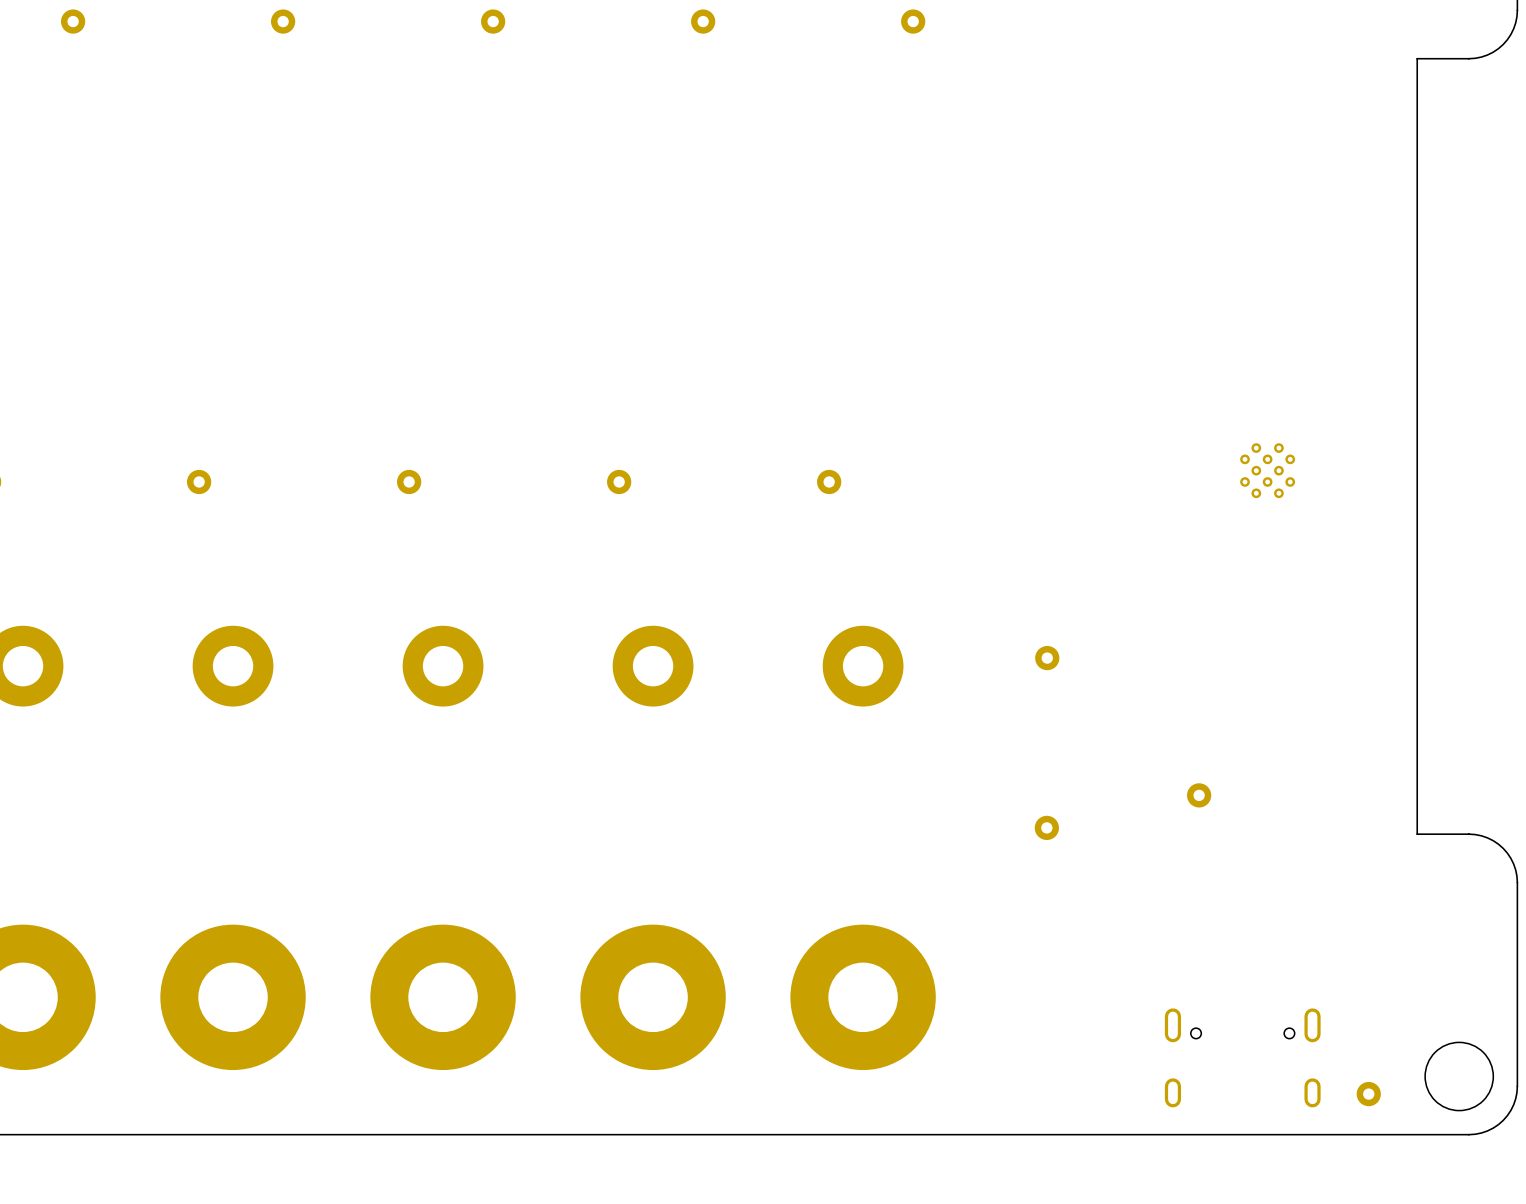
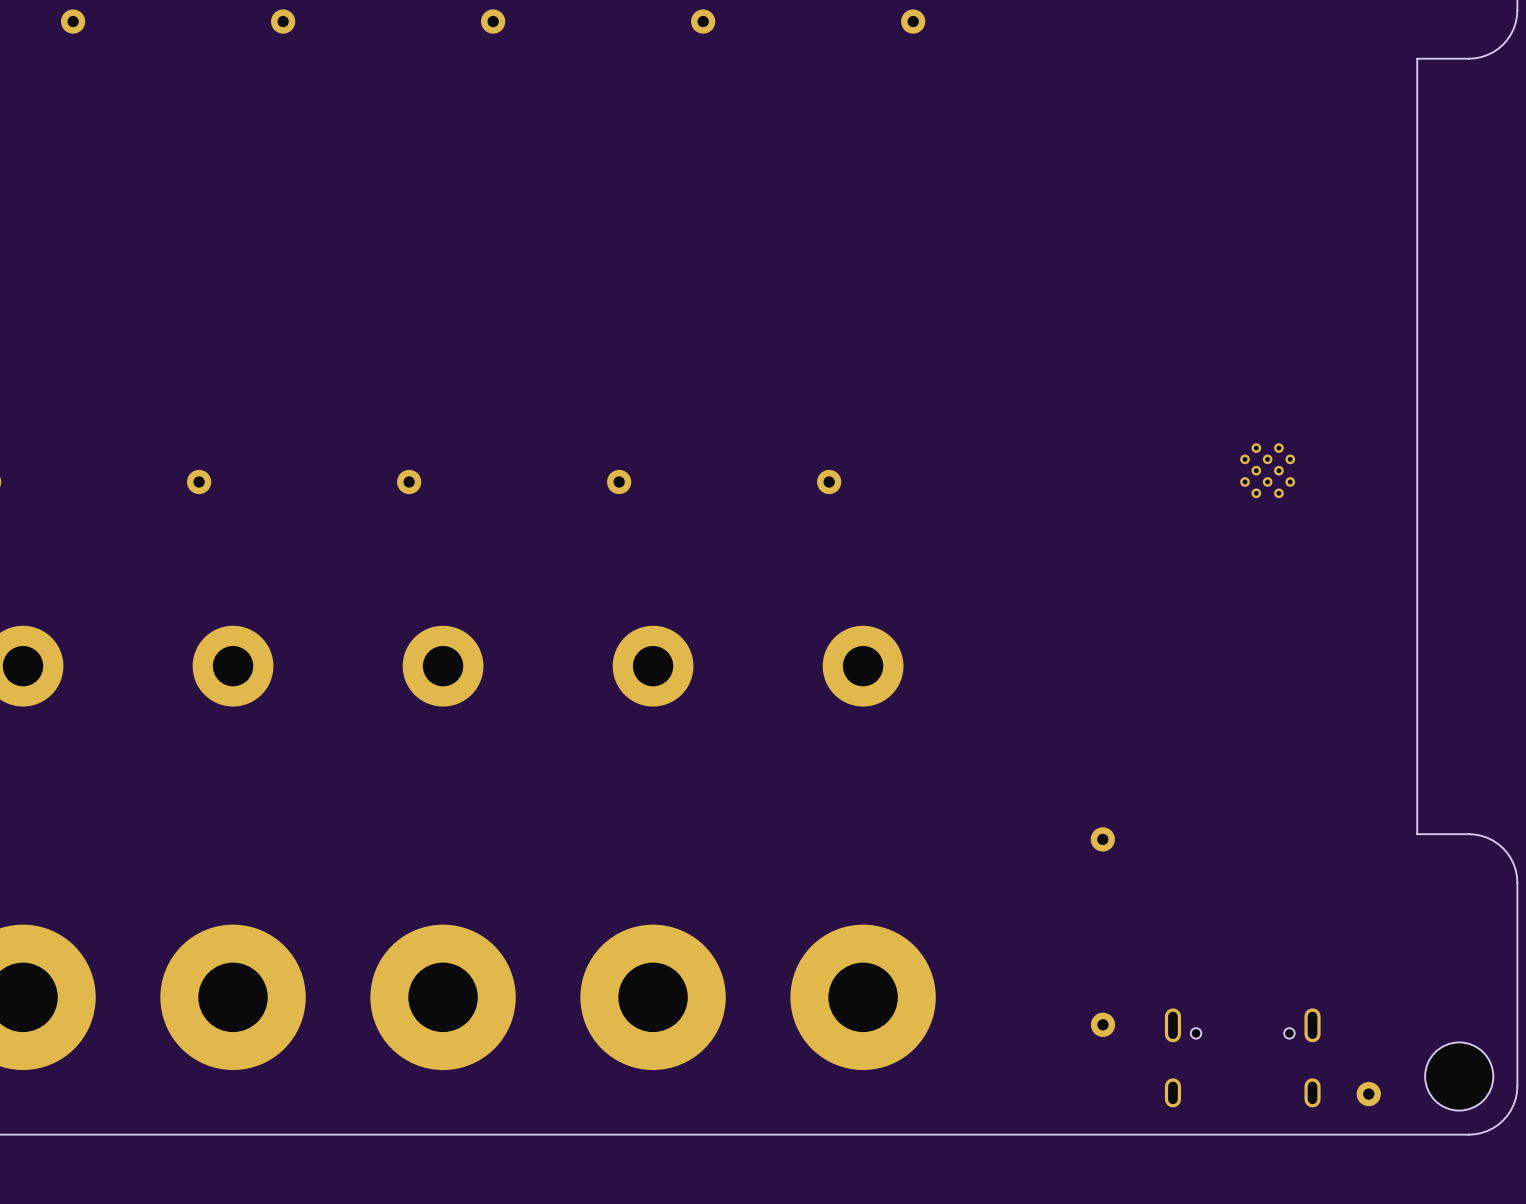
part: (1047, 658) -> none
part: (1199, 795) -> none
part: (1046, 827) -> none
part: none -> (1102, 839)
part: none -> (1103, 1024)

